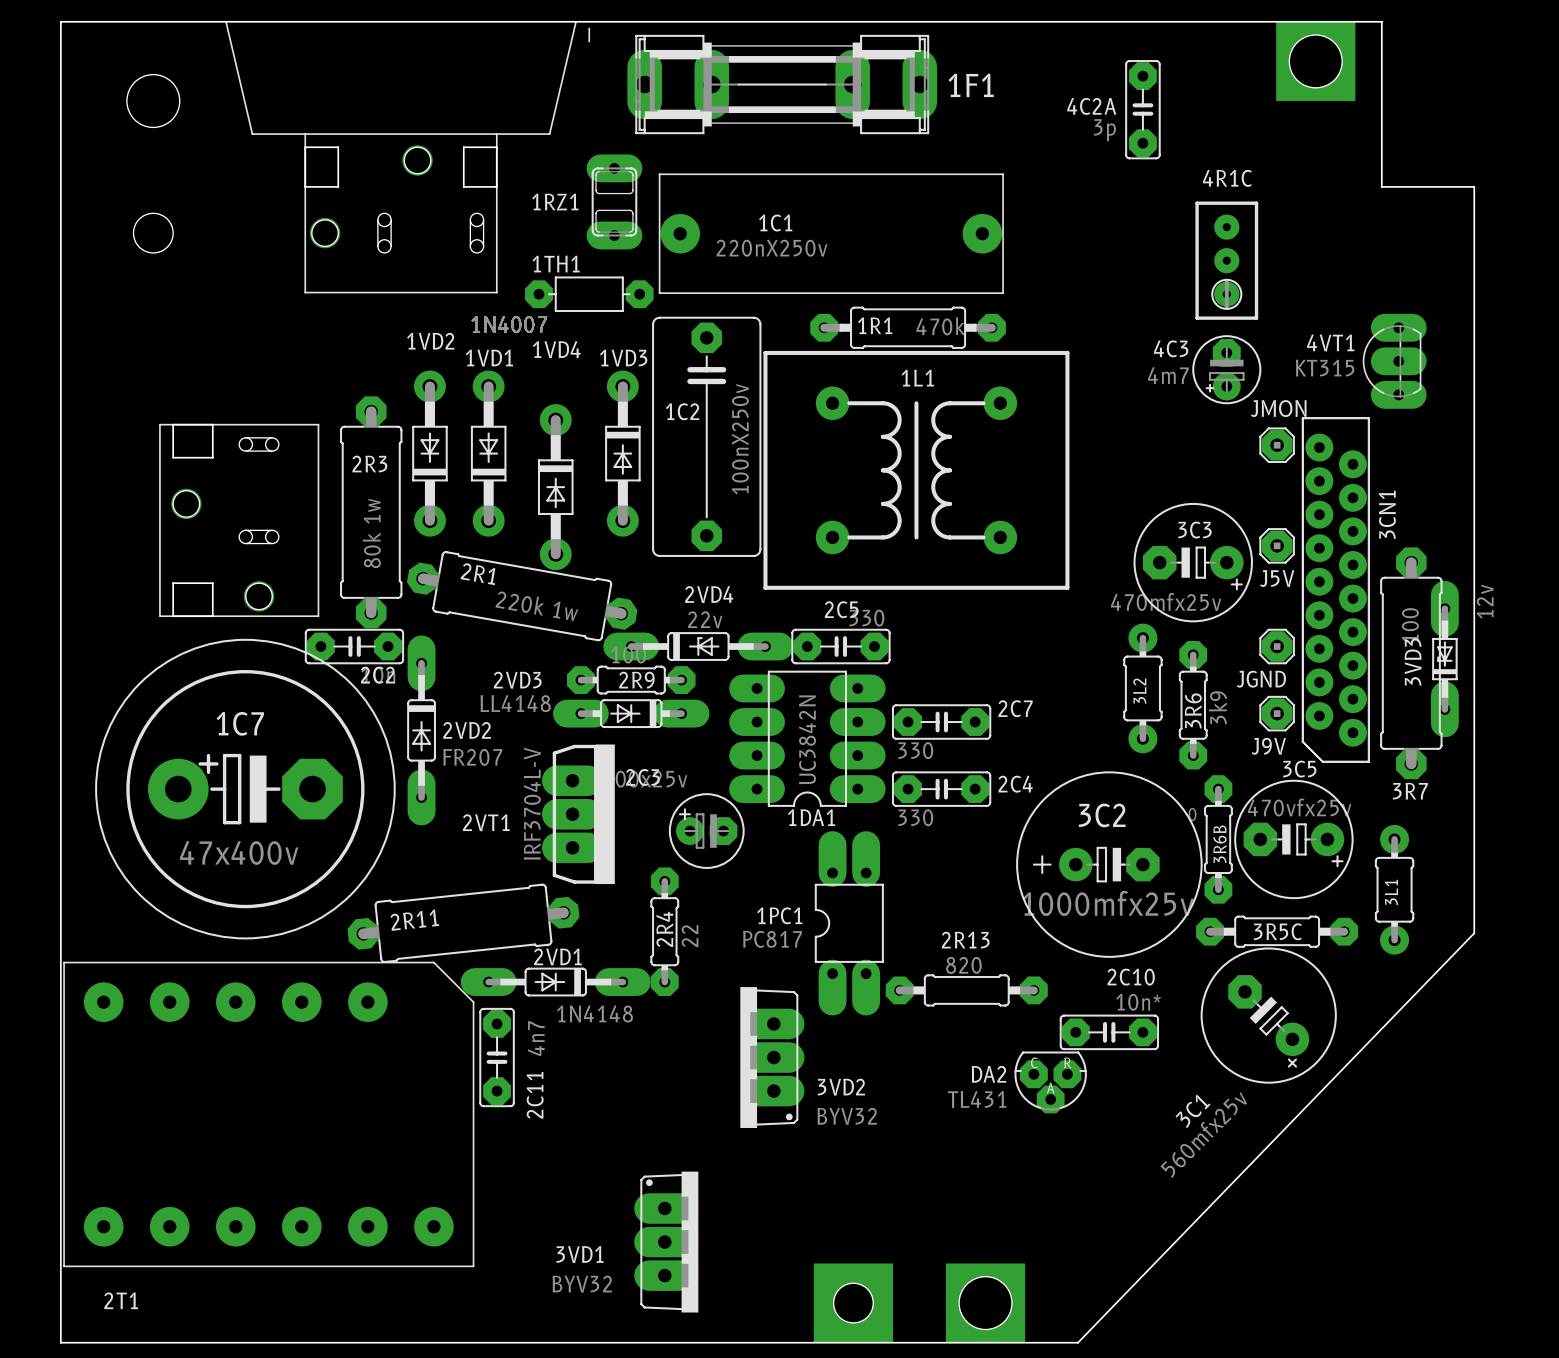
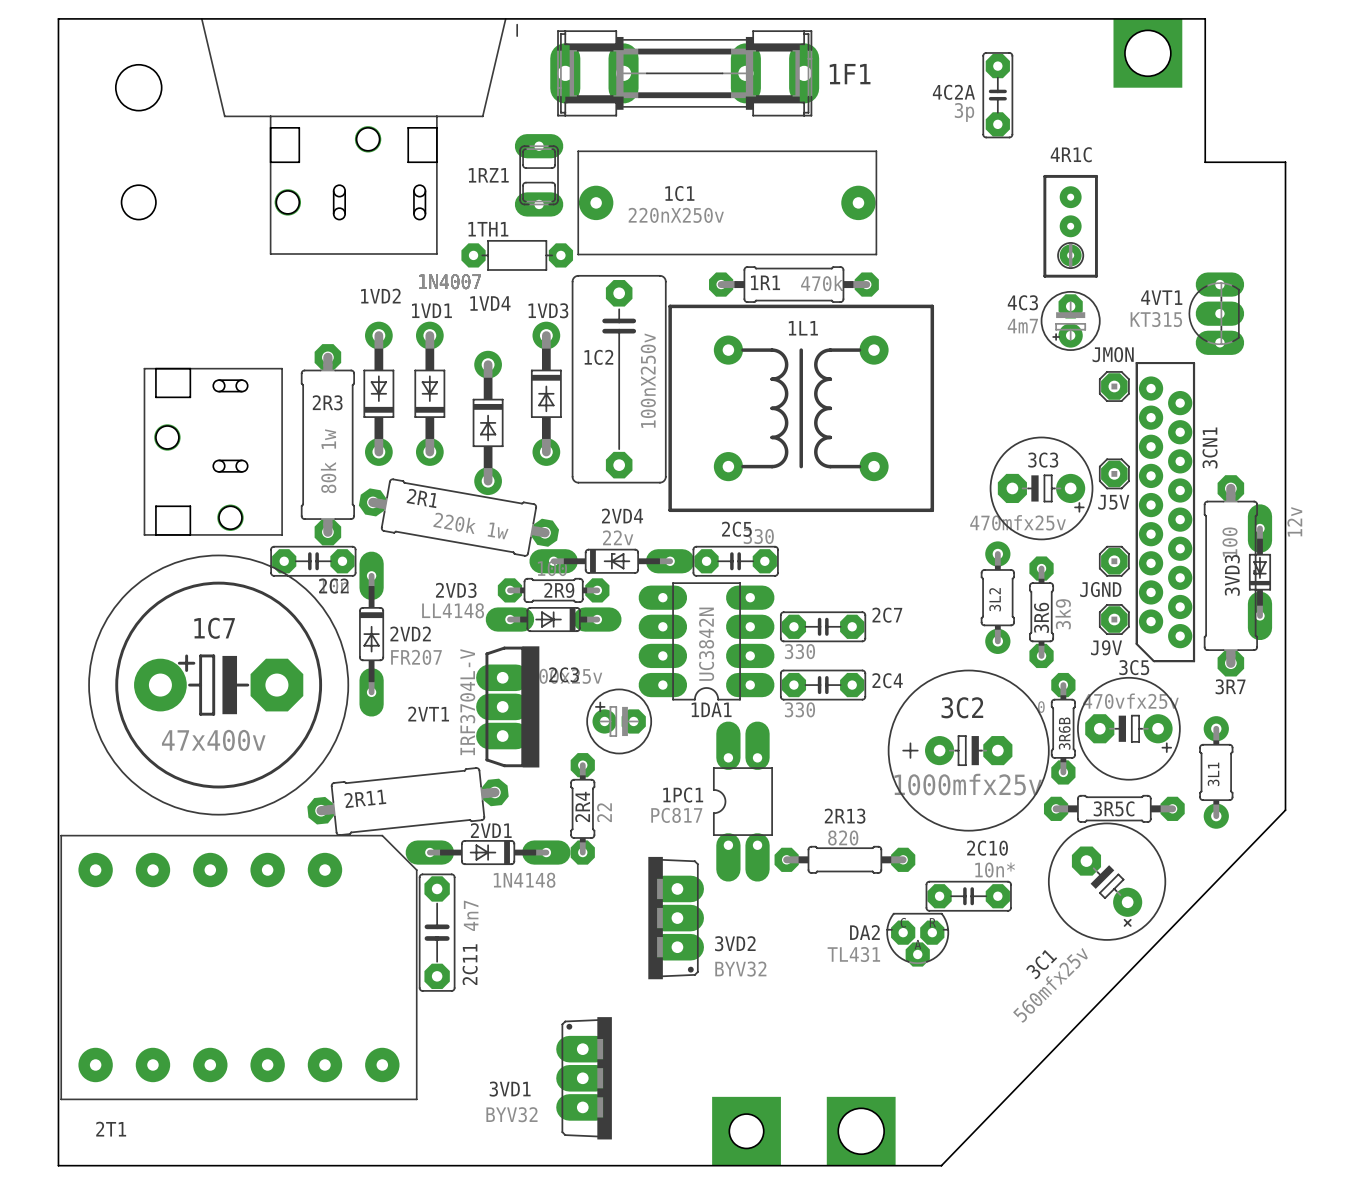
2C11 footprint: [479, 1007, 515, 1108] -> [418, 873, 456, 992]

